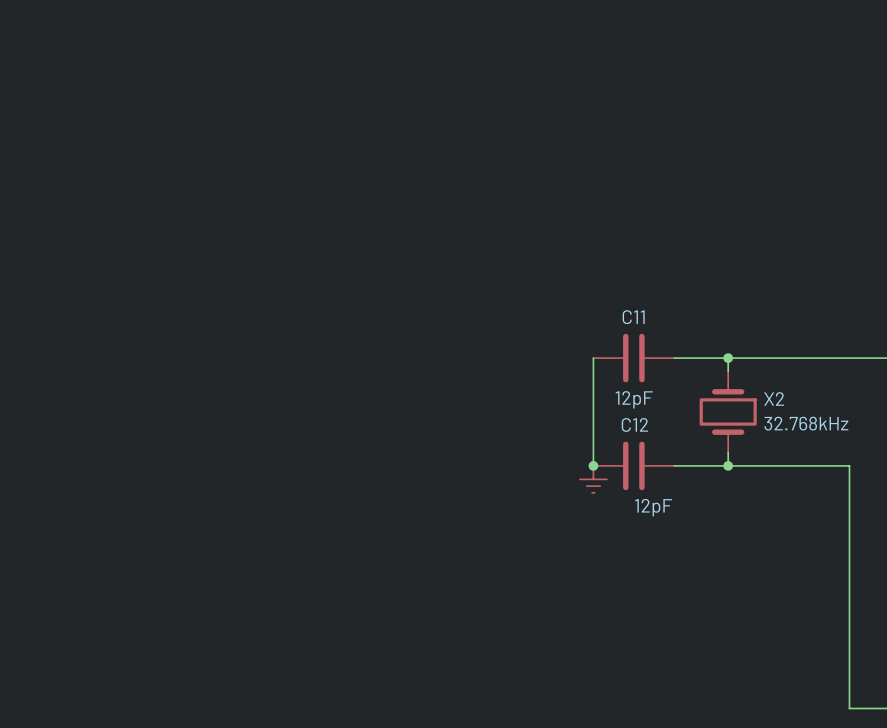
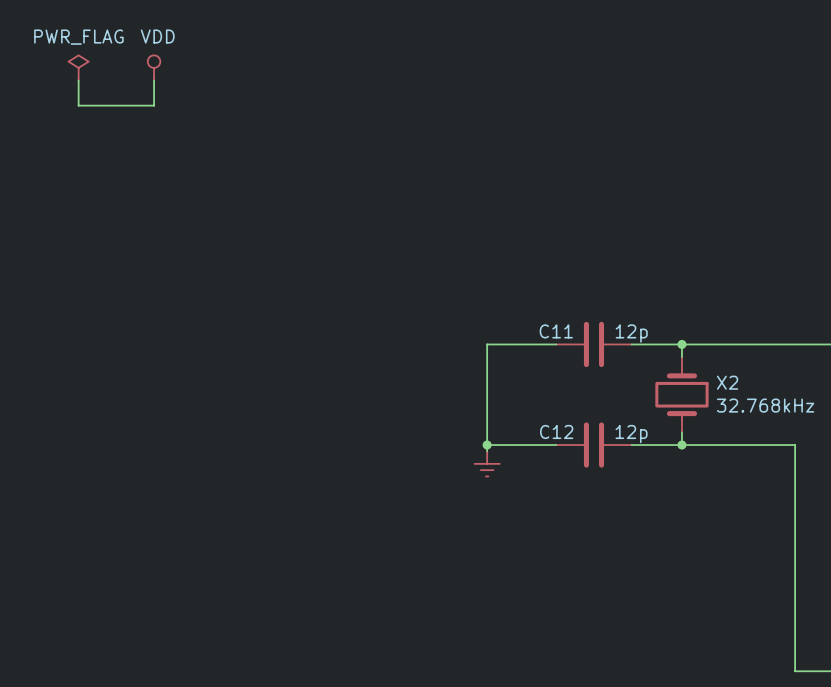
power symbol: none -> PWR_FLAG (78, 67)
power symbol: none -> VDD (154, 67)
wire: none -> (78, 80) (78, 105) (154, 105) (154, 80)
C11 name position: C11 (633, 317) -> C11 (556, 331)
wire: (593, 358) (593, 465) -> (556, 344) (487, 344) (487, 451)
C11 value: 12pF (634, 399) -> 12p (631, 333)
C12 name position: C12 (634, 424) -> C12 (556, 431)
wire: none -> (487, 445) (556, 445)
junction: none -> (487, 445)
junction: (593, 465) -> none
power symbol position: (593, 479) -> (487, 463)
C12 value: 12pF (653, 507) -> 12p (631, 434)

